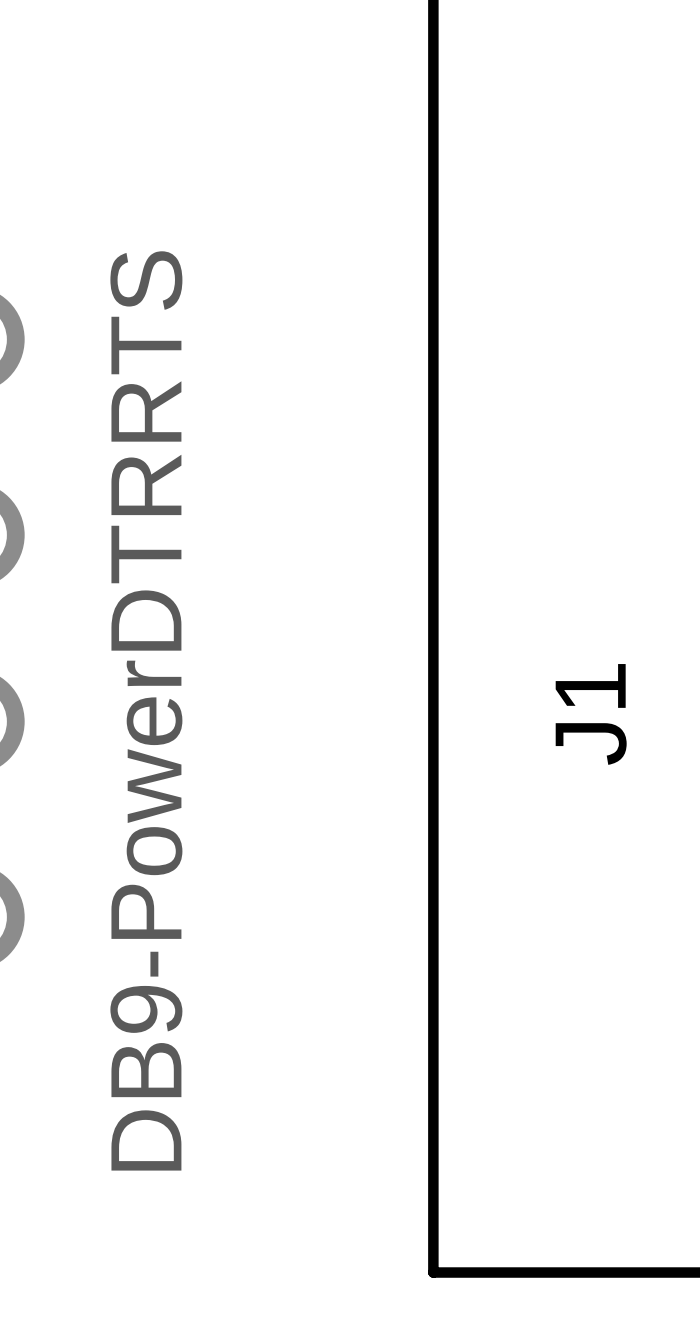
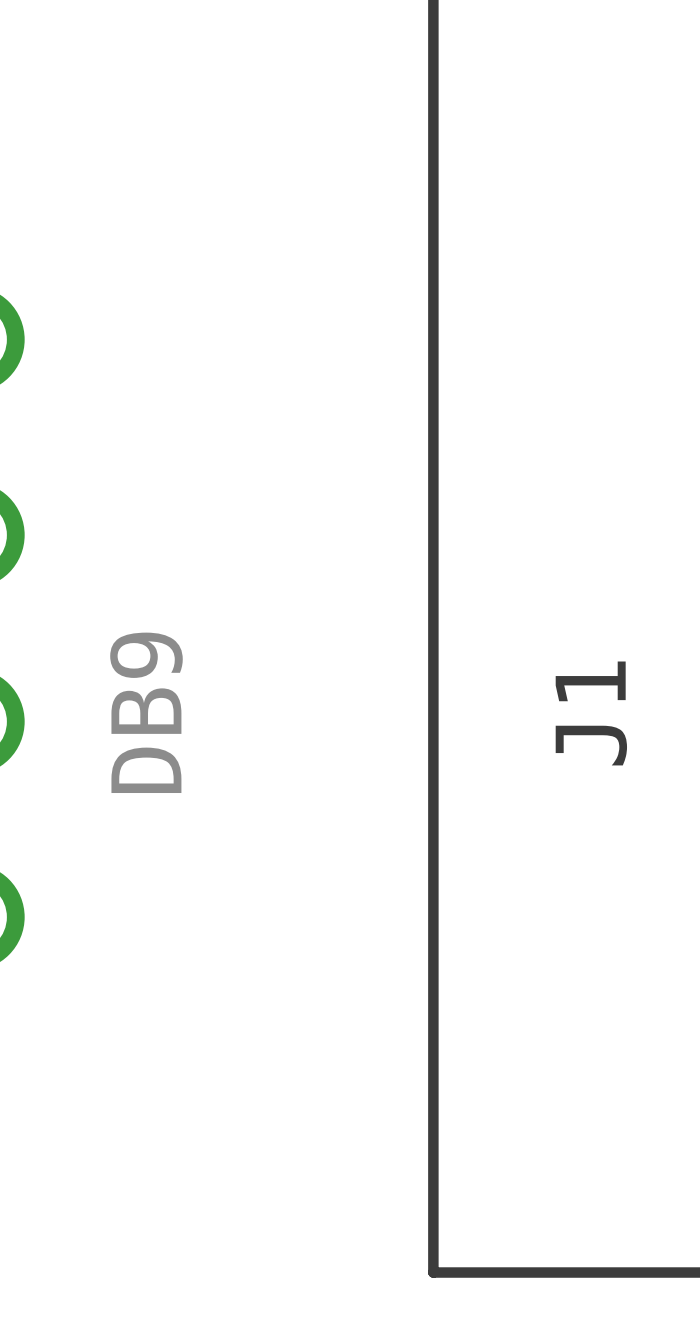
J1 value: DB9-PowerDTRRTS (146, 710) -> DB9 (146, 712)

